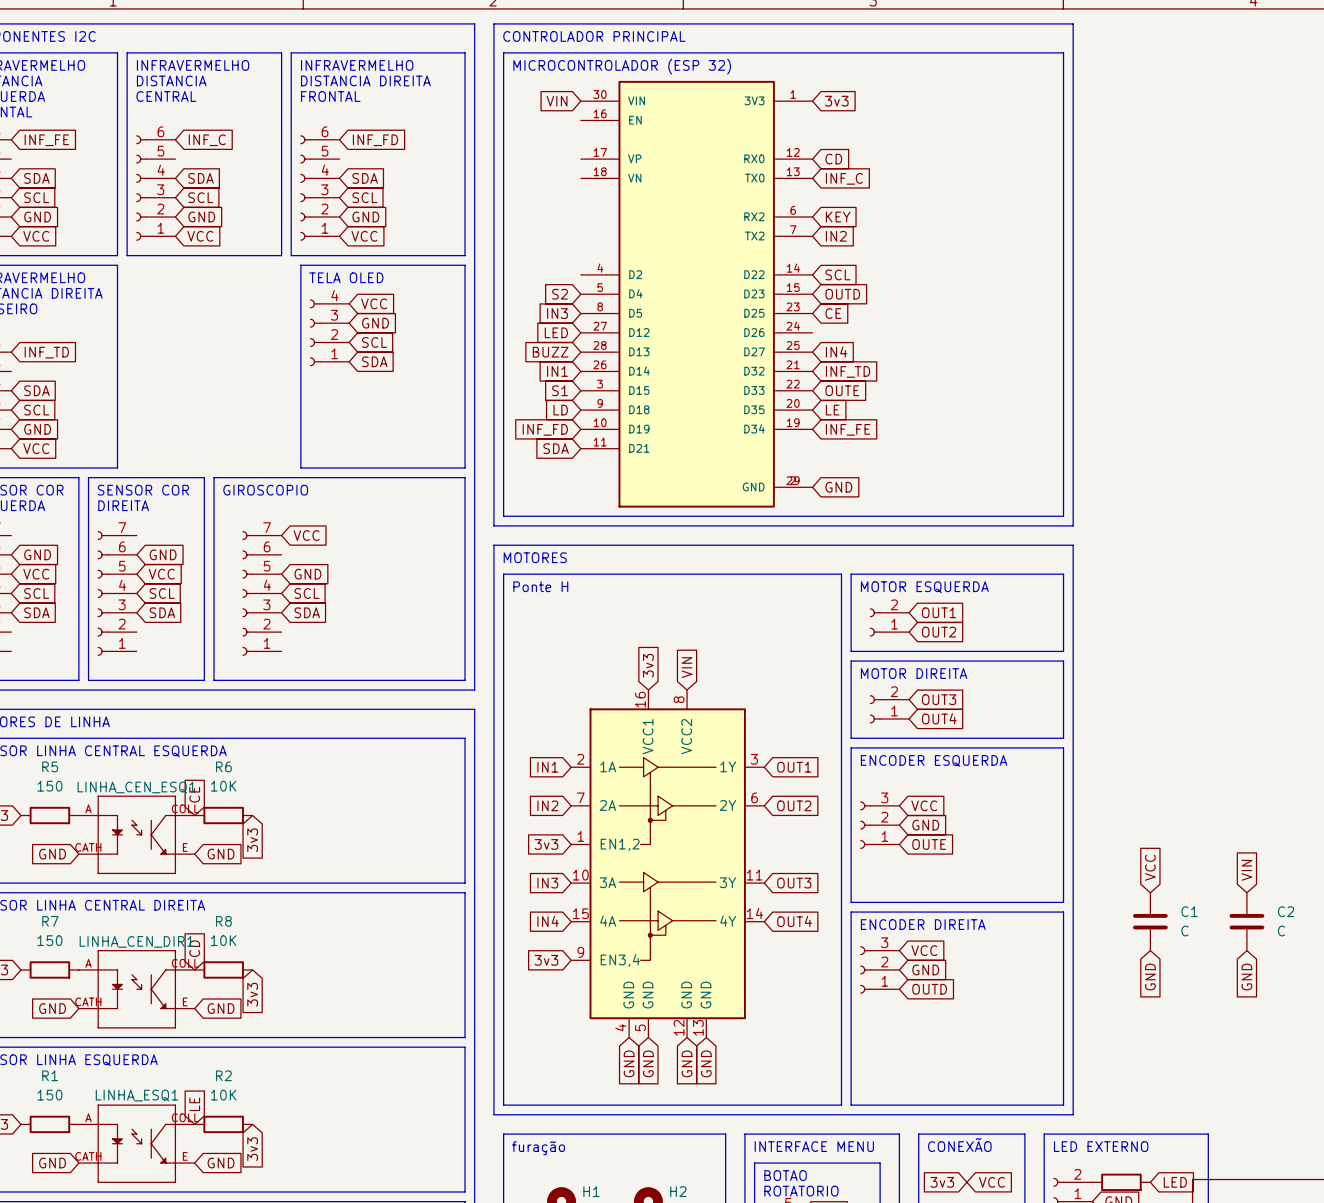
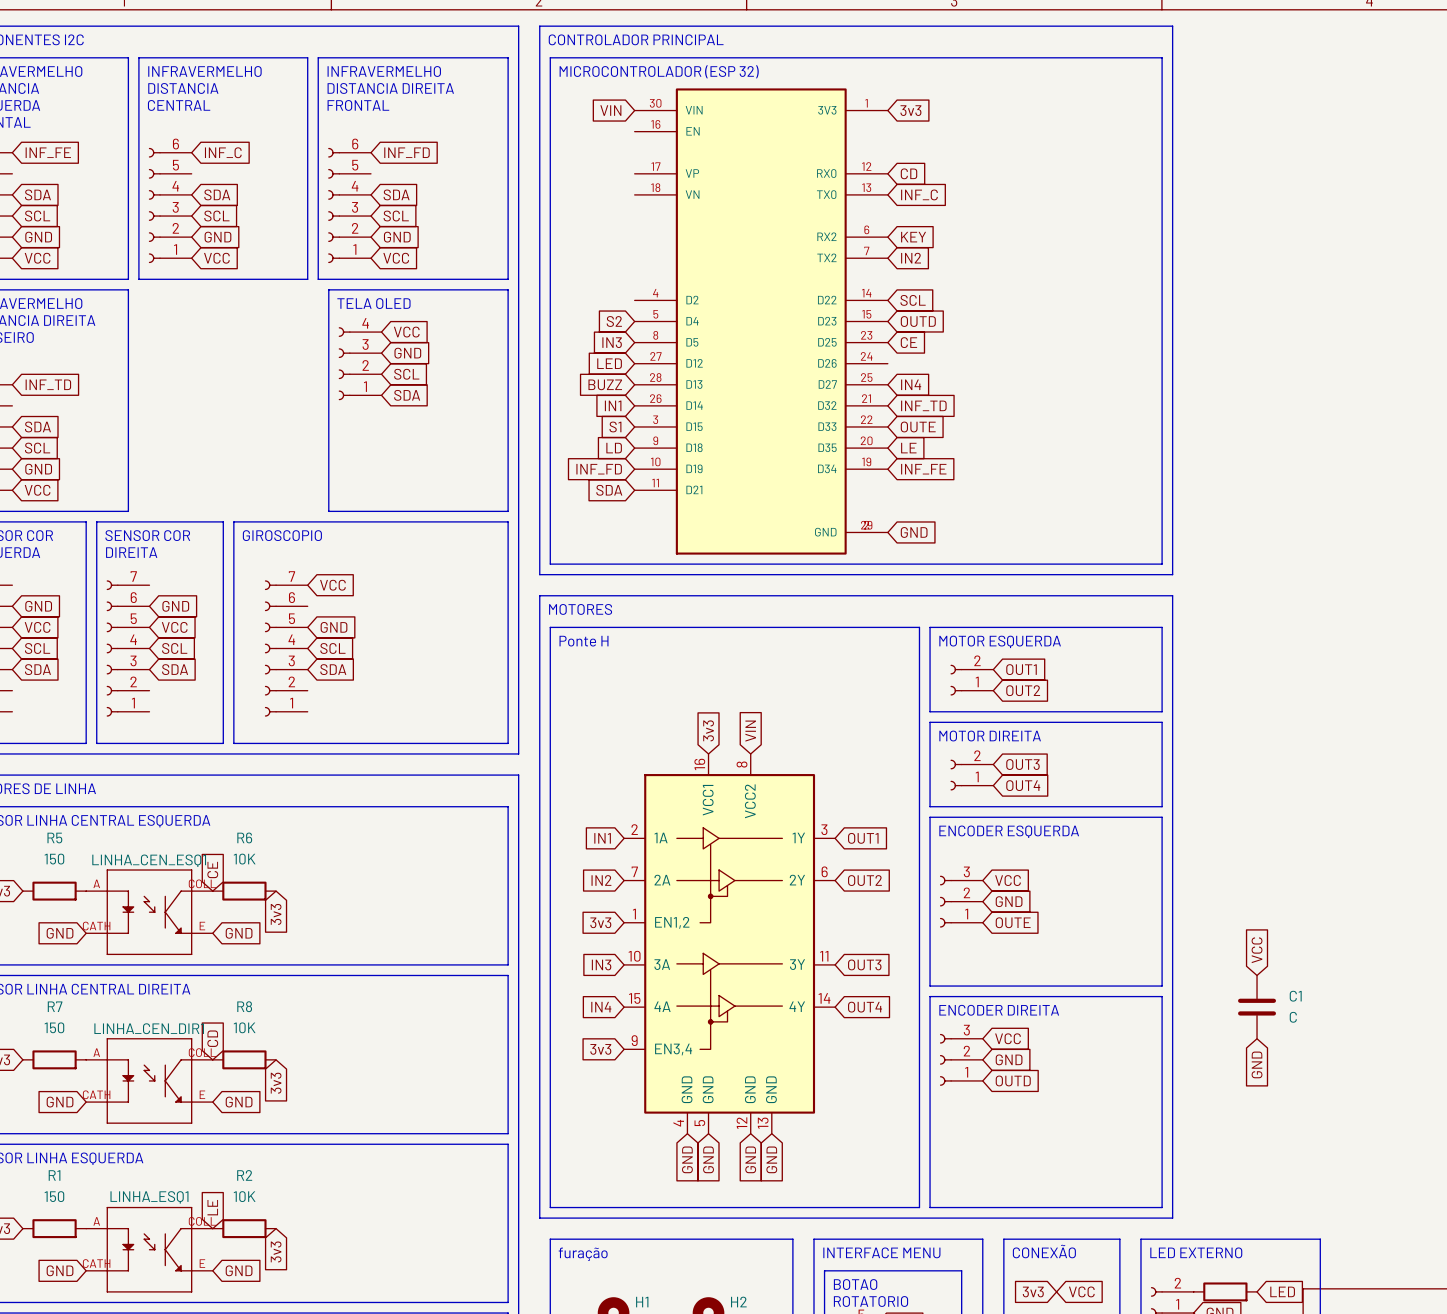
global label: VIN (1246, 870) -> none
C2: C (1246, 921) -> none
global label: GND (1246, 976) -> none

